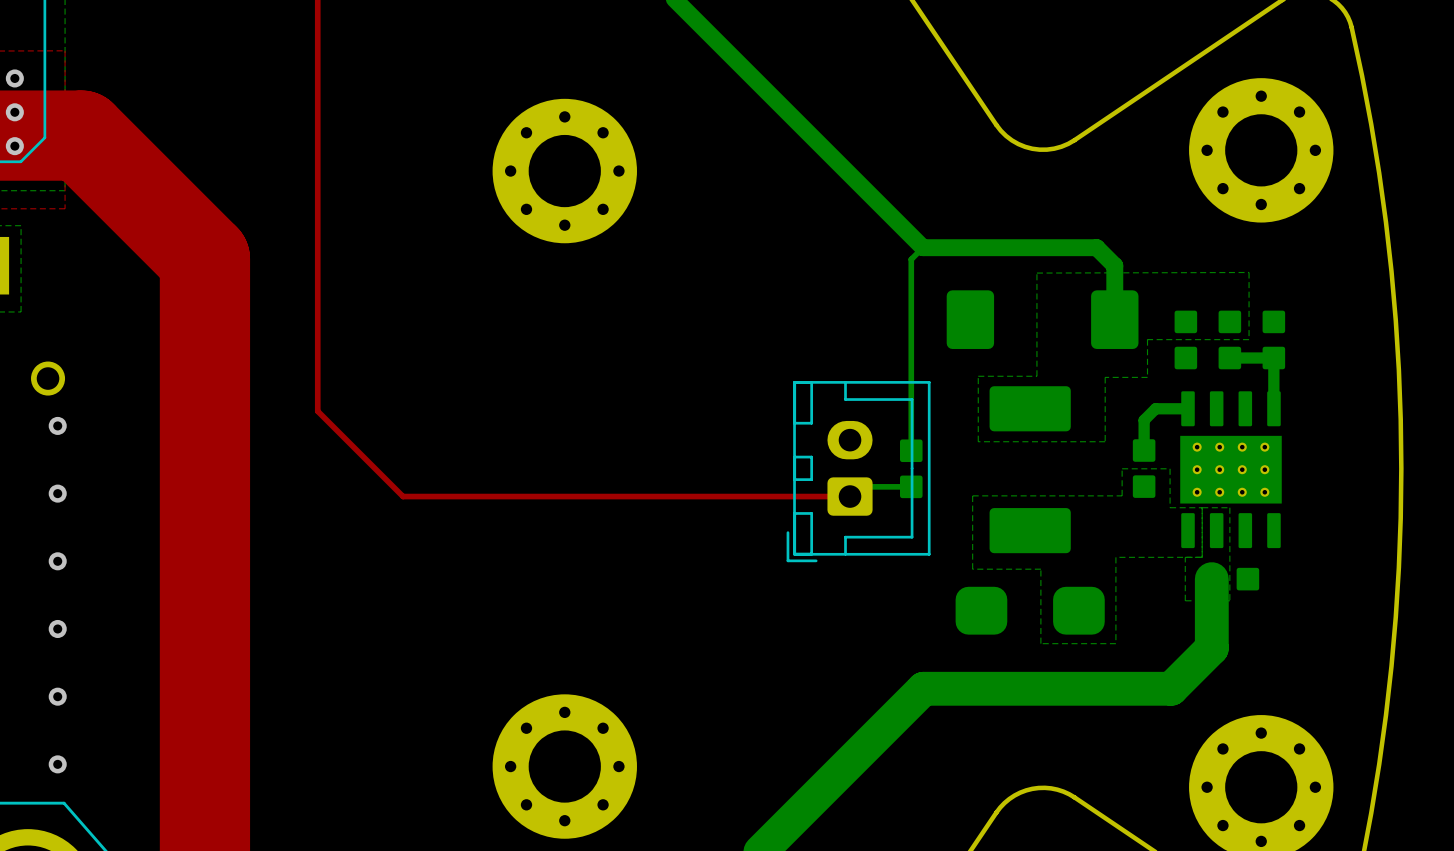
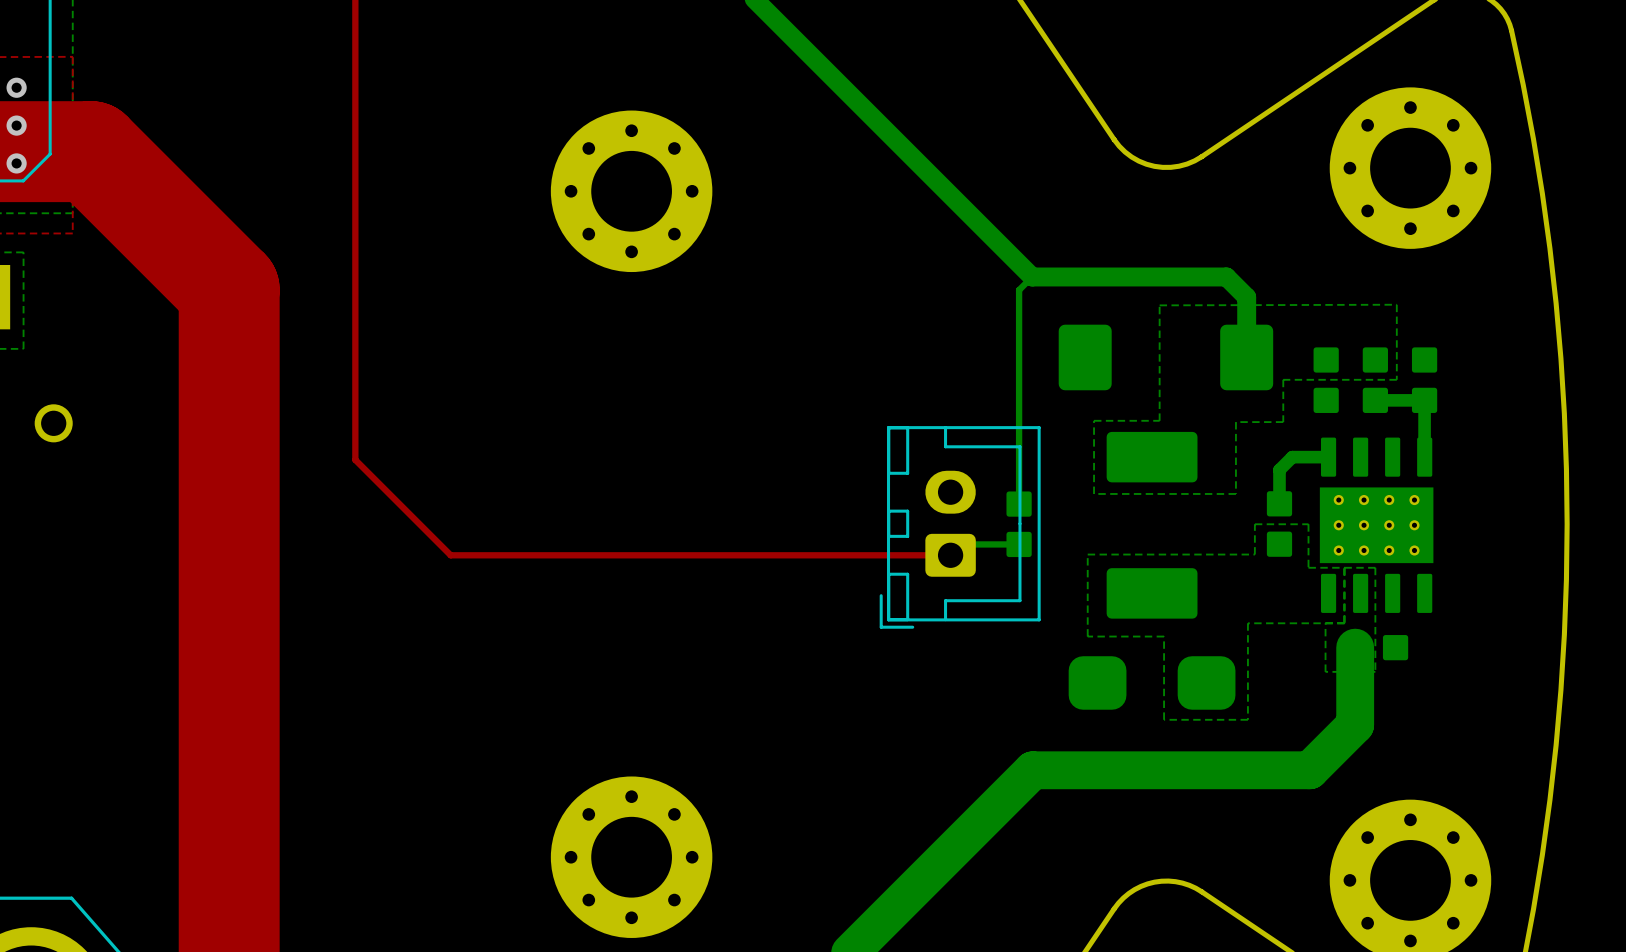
via: (57, 425) -> none
via: (57, 493) -> none
via: (57, 561) -> none
via: (57, 628) -> none
via: (57, 696) -> none
via: (57, 764) -> none

